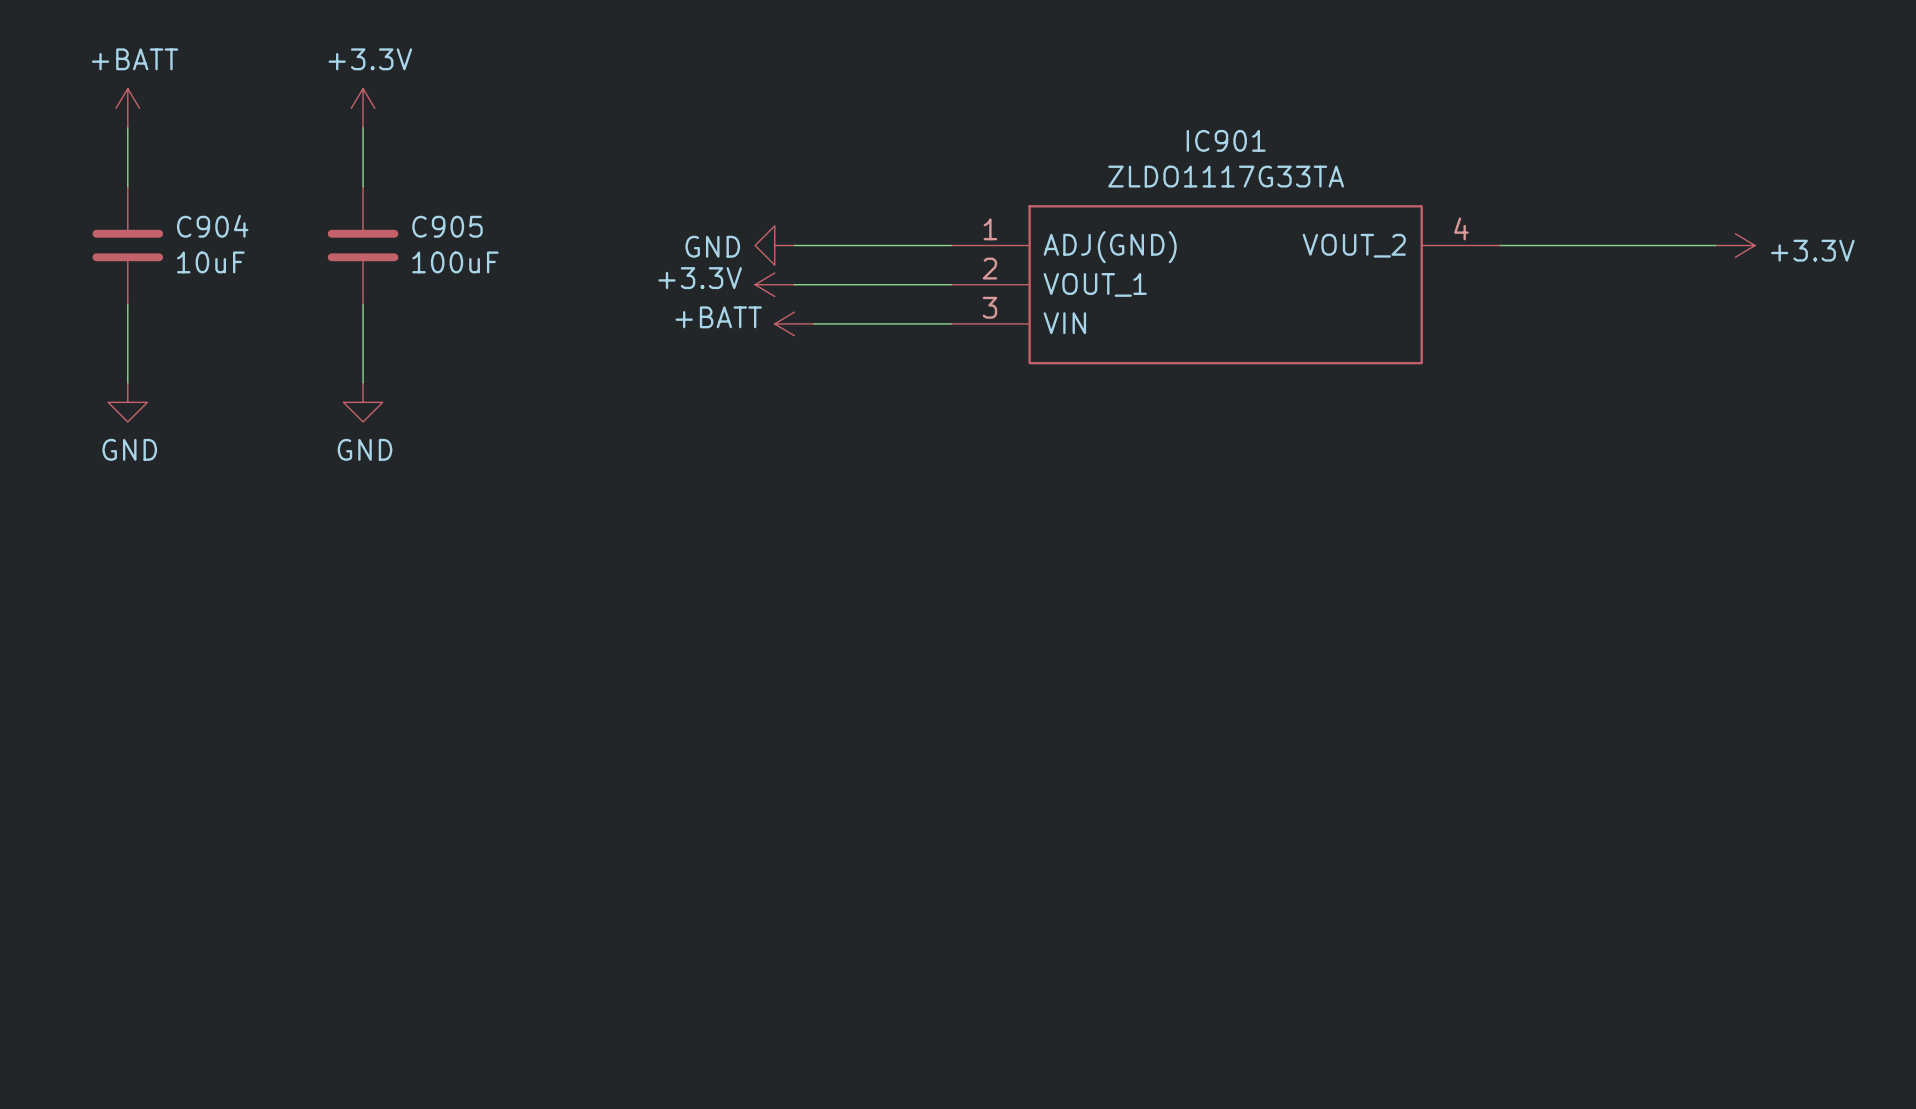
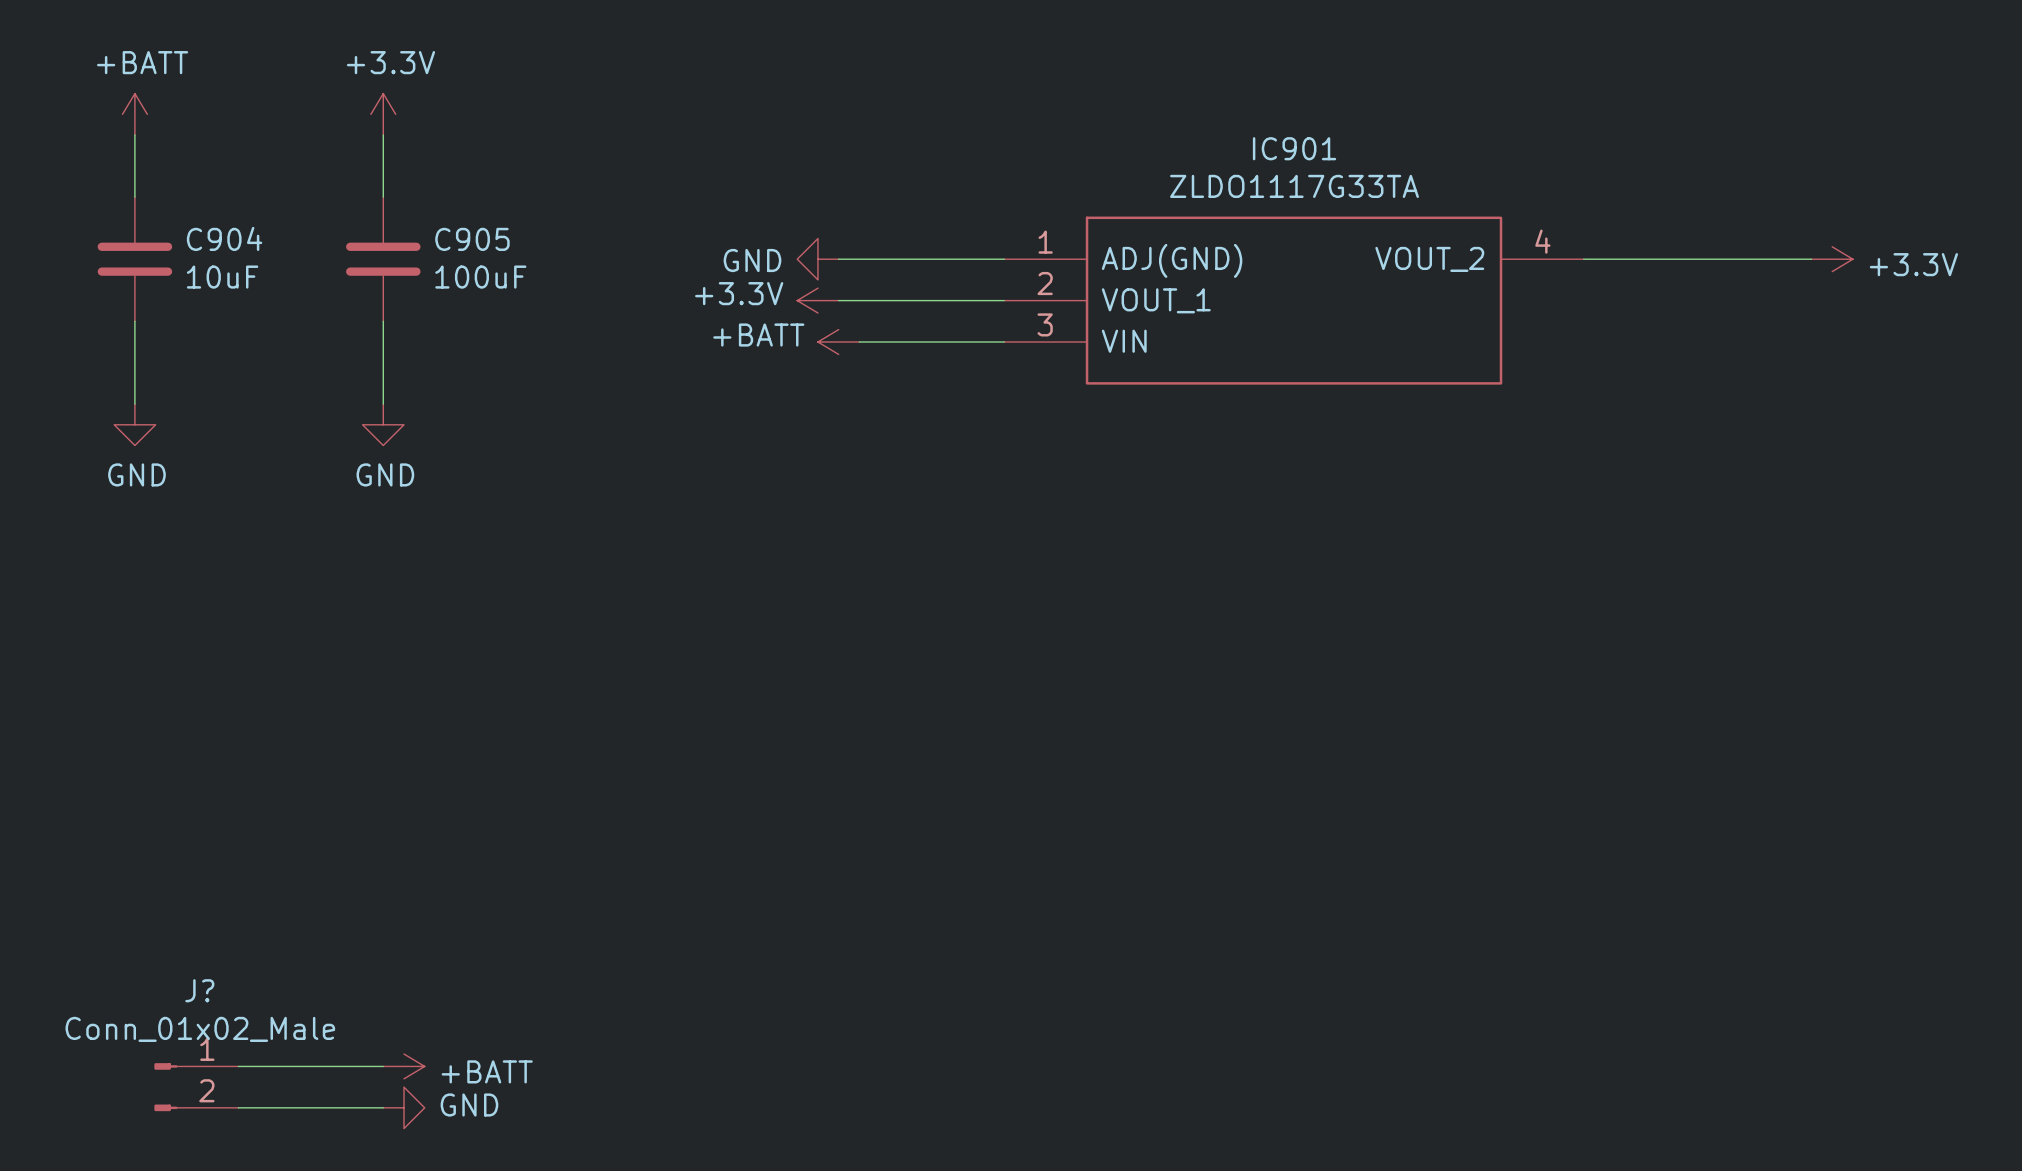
wire: none -> (238, 1066) (383, 1066)
power symbol: none -> +BATT (403, 1066)
J?: none -> Conn_01x02_Male (196, 1087)
wire: none -> (238, 1107) (383, 1107)
power symbol: none -> GND (403, 1107)

